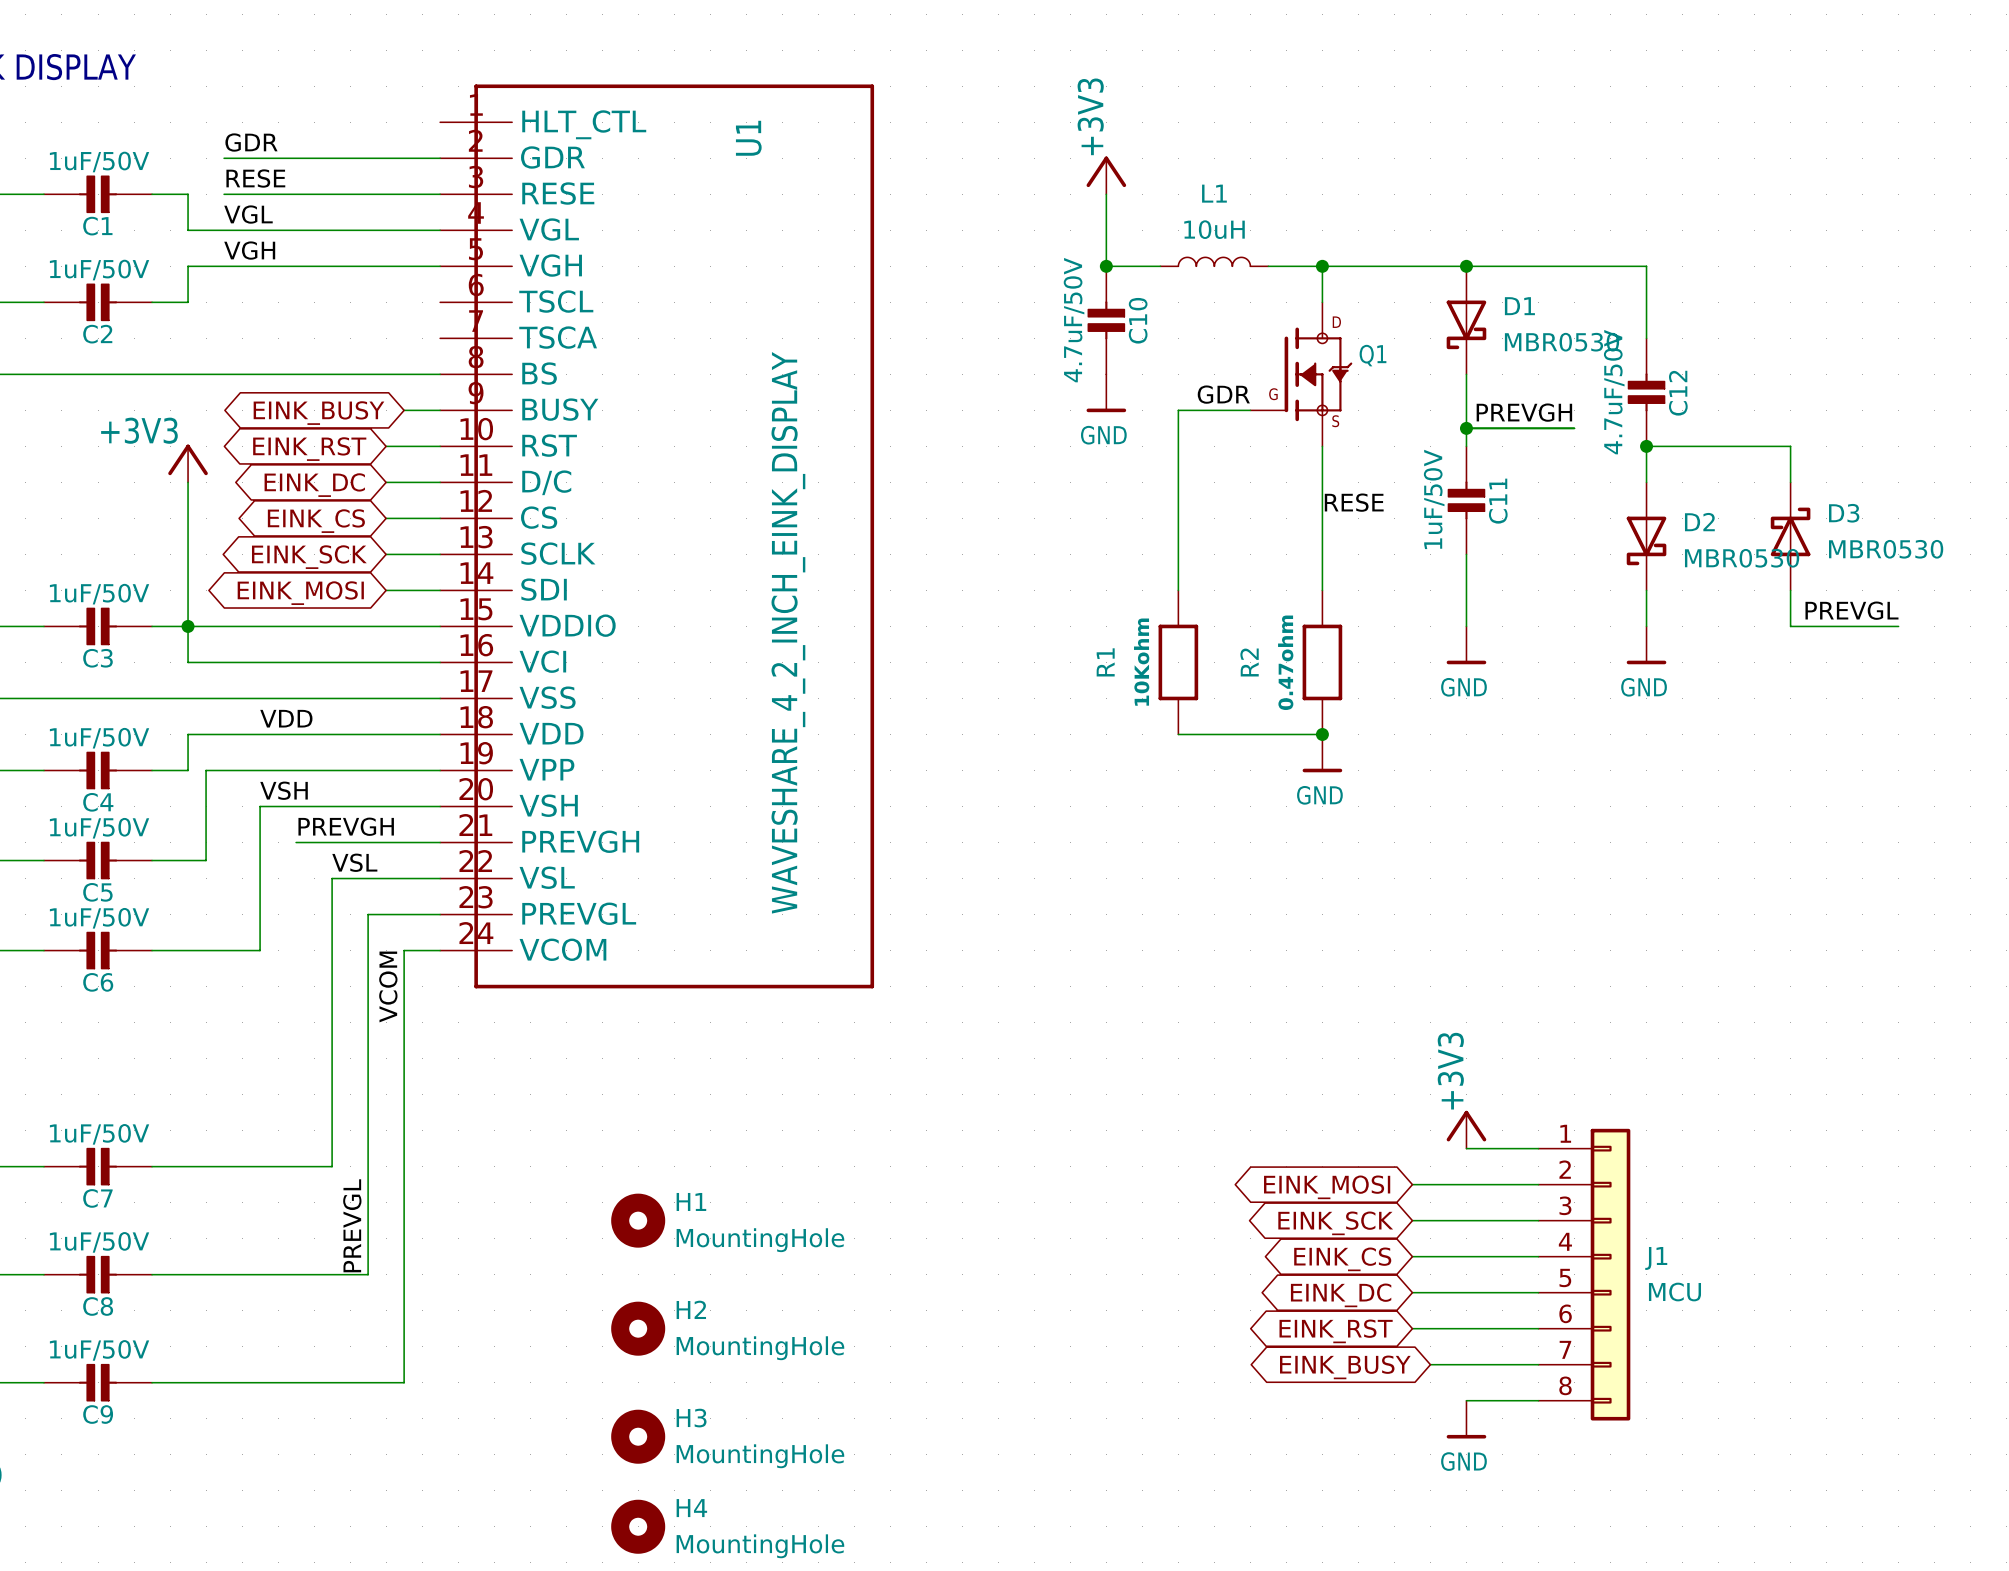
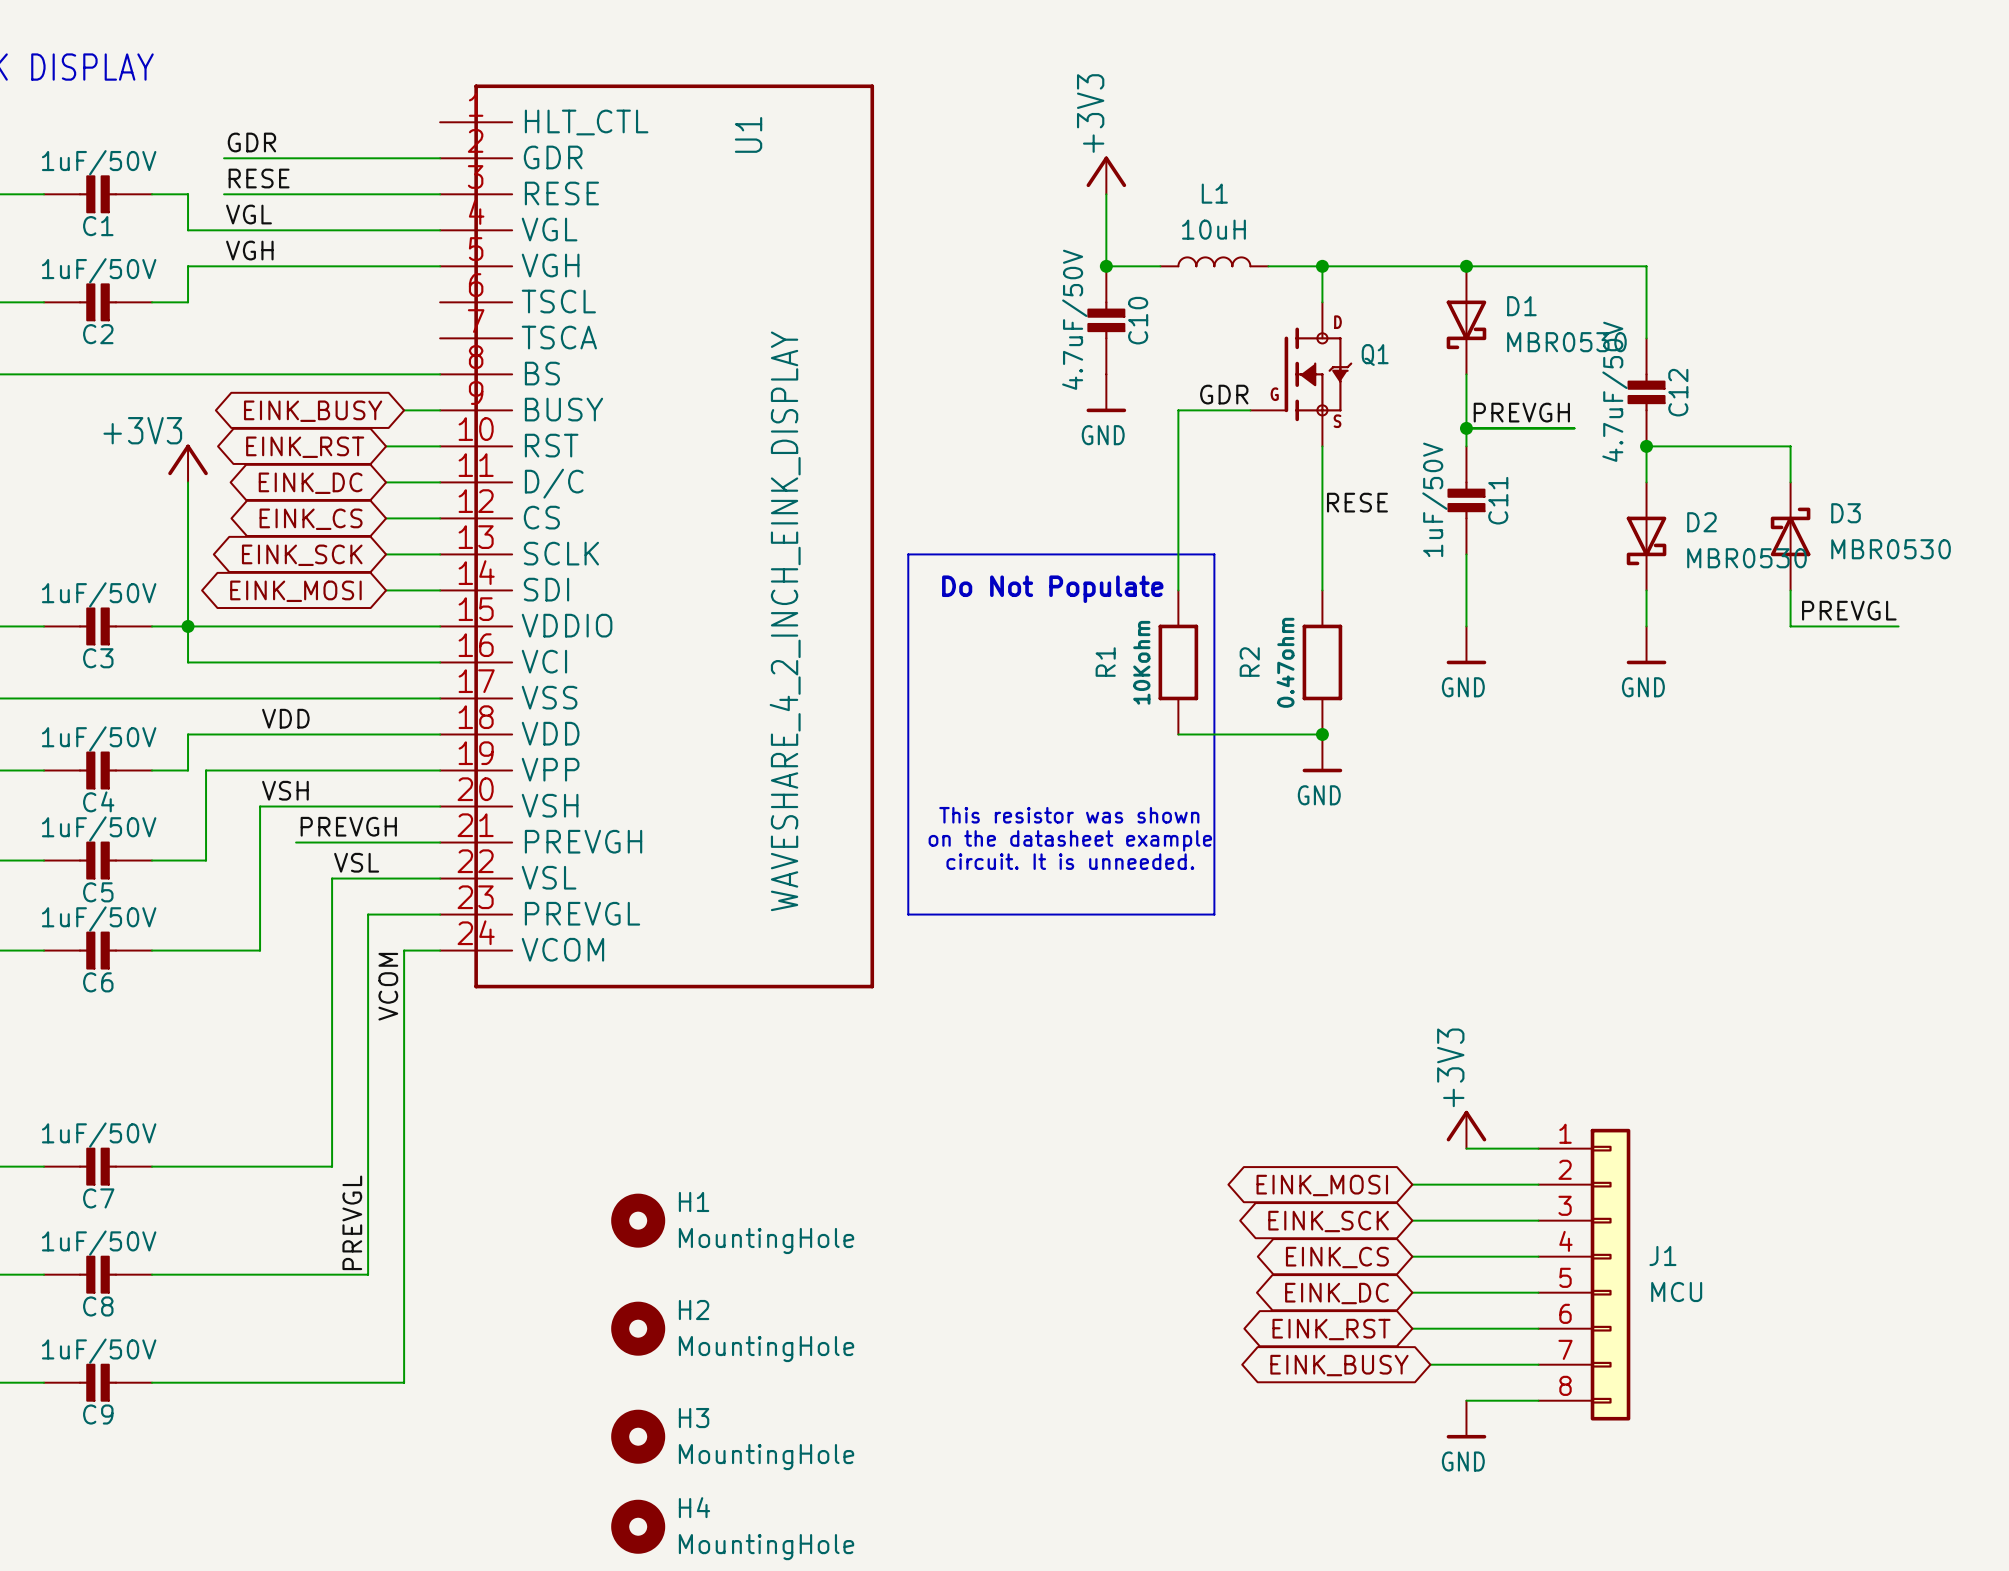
line: none -> (908, 554) (1214, 554) (1214, 914) (908, 914) (908, 554)
text: none -> Do Not Populate (1052, 589)
text: none -> This resistor was shown (1069, 815)
text: none -> on the datasheet example (1070, 840)
text: none -> circuit. It is unneeded. (1070, 861)

